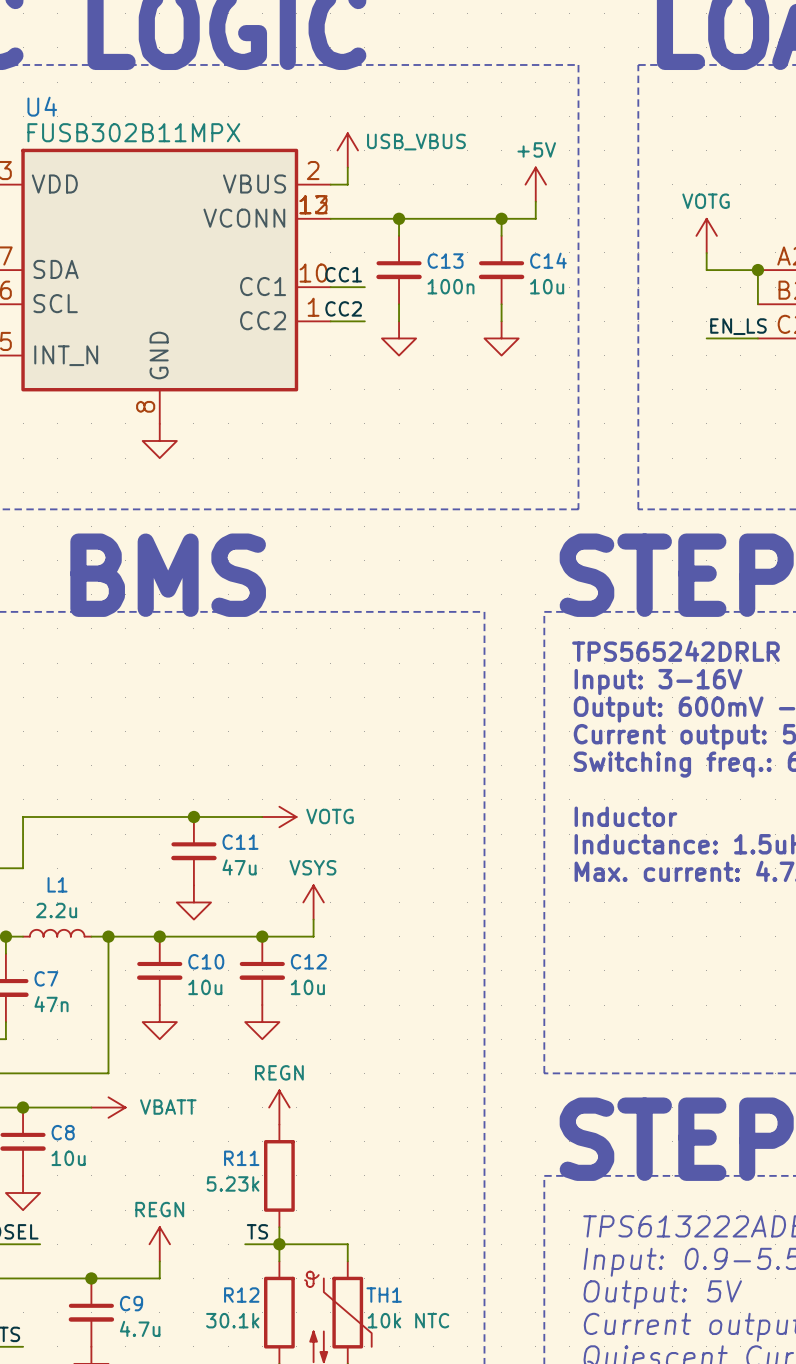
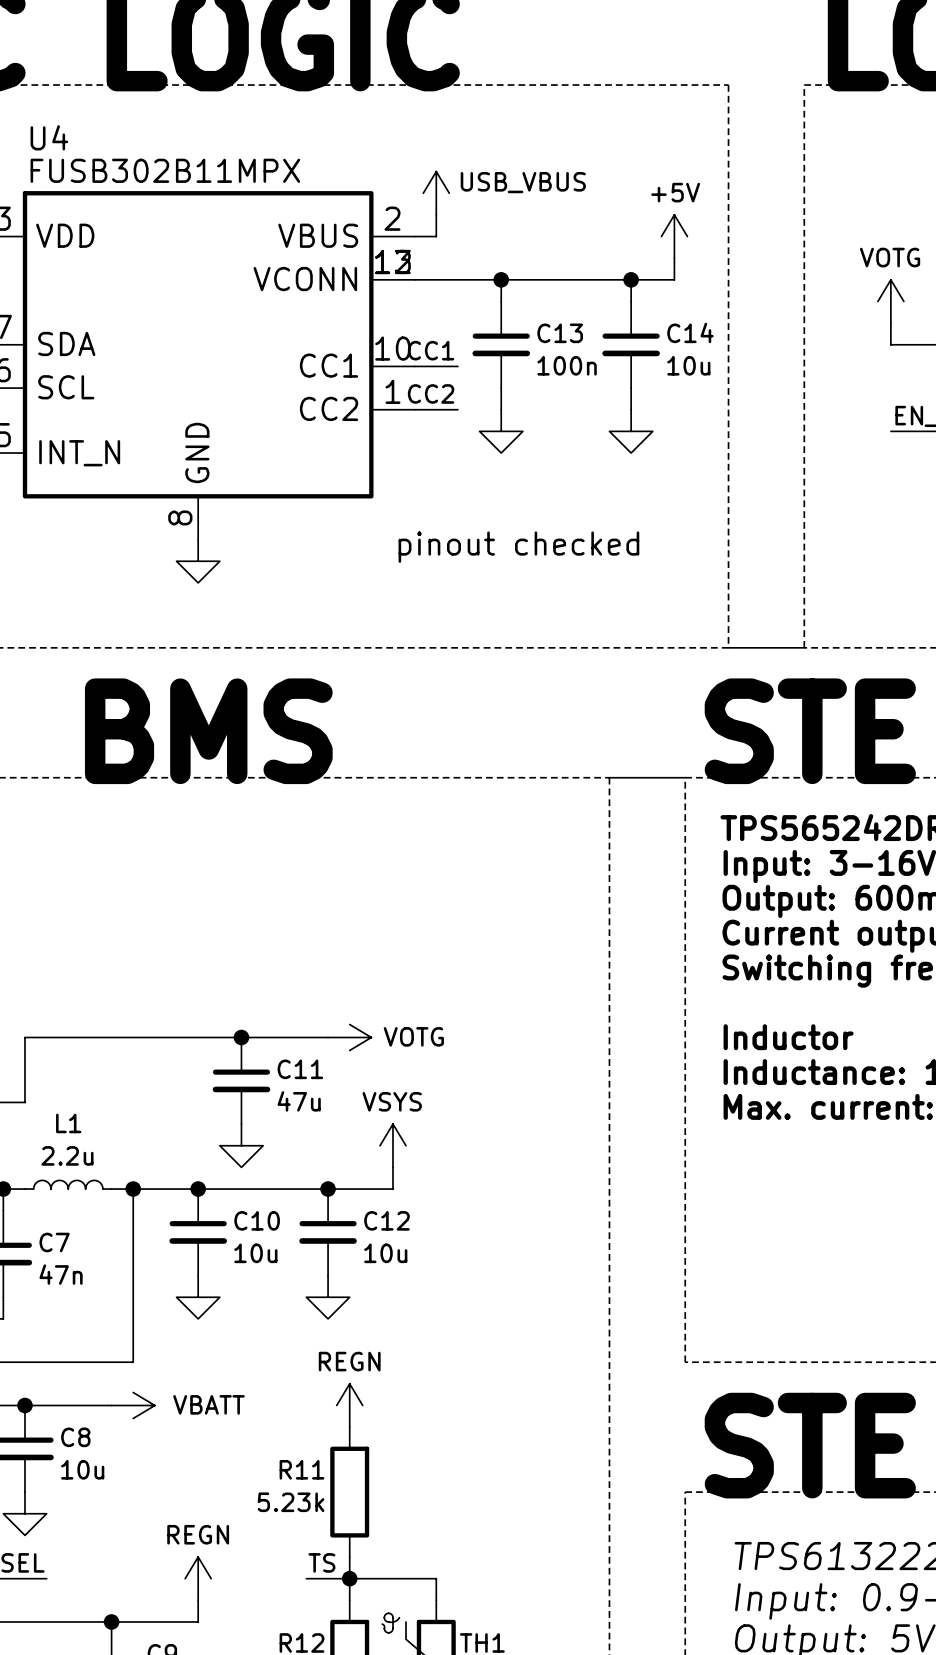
text: none -> pinout checked (518, 547)
line: none -> (728, 647) (804, 647)
line: none -> (609, 777) (685, 777)

